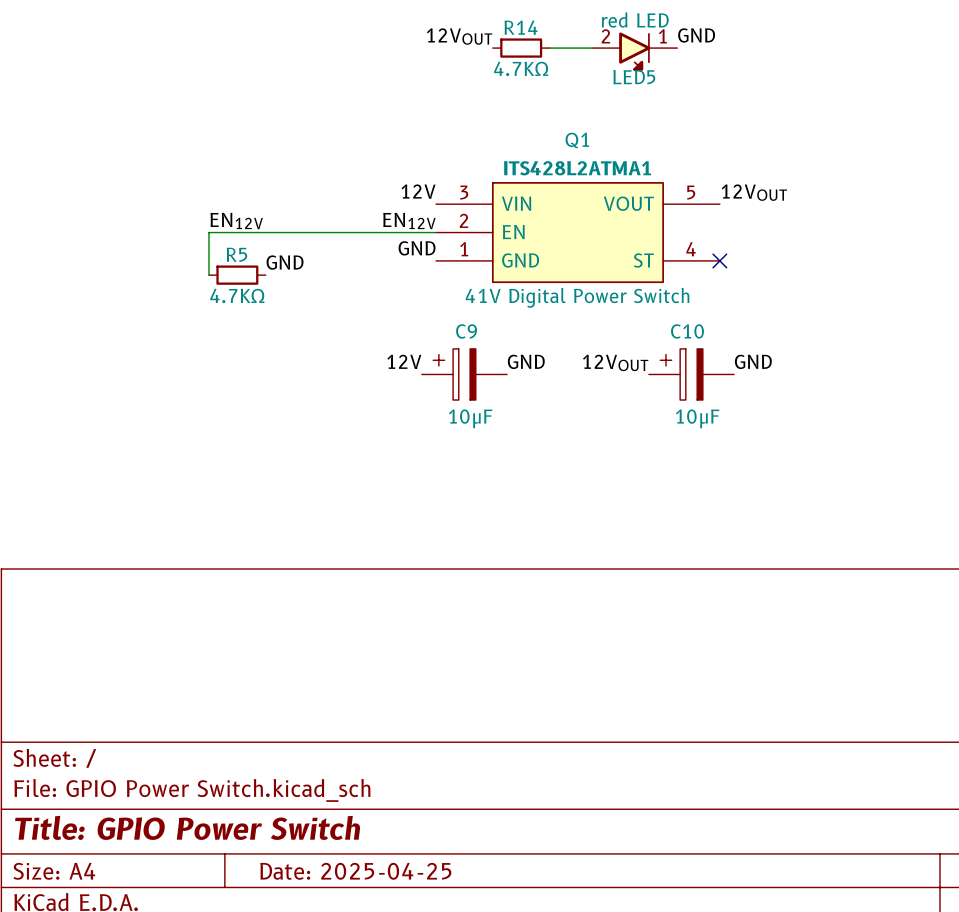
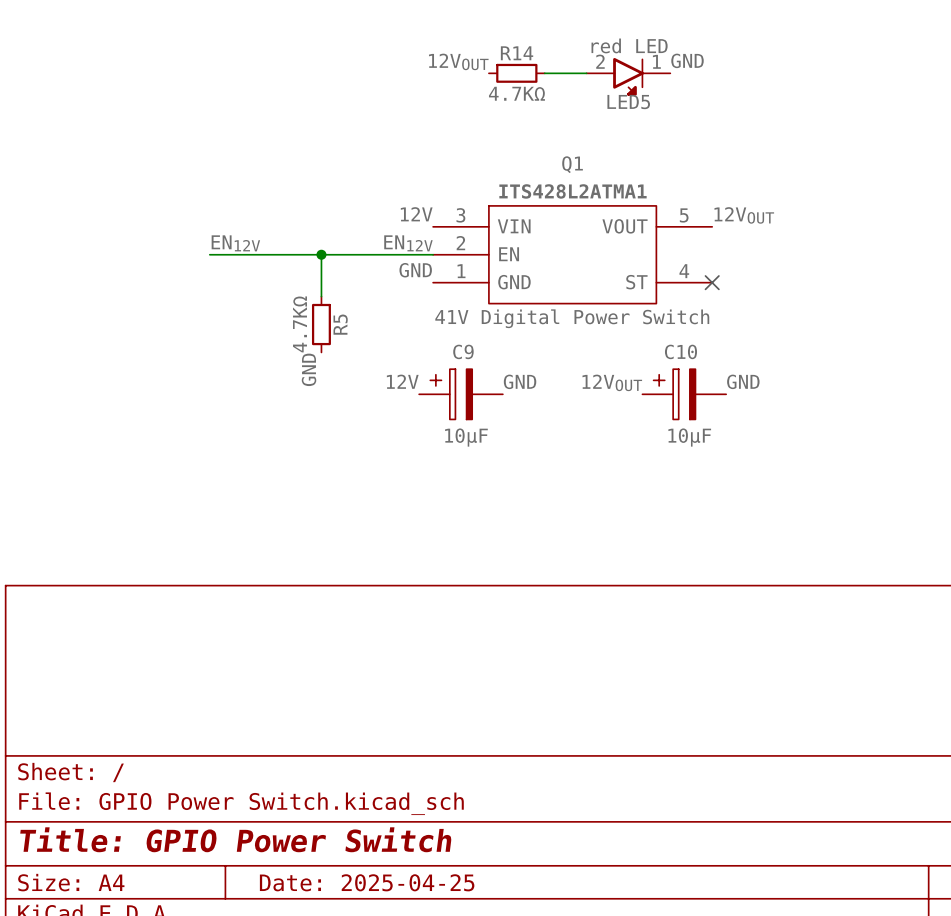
wire: (208, 232) (208, 275) -> (321, 254) (321, 296)
junction: none -> (321, 254)
label rotation: 0° (285, 262) -> 90° counterclockwise (309, 369)
label position: GND (285, 262) -> GND (309, 369)
R5 rotation: 0° (237, 275) -> 90° clockwise (321, 324)
R5 position: (237, 275) -> (321, 324)

